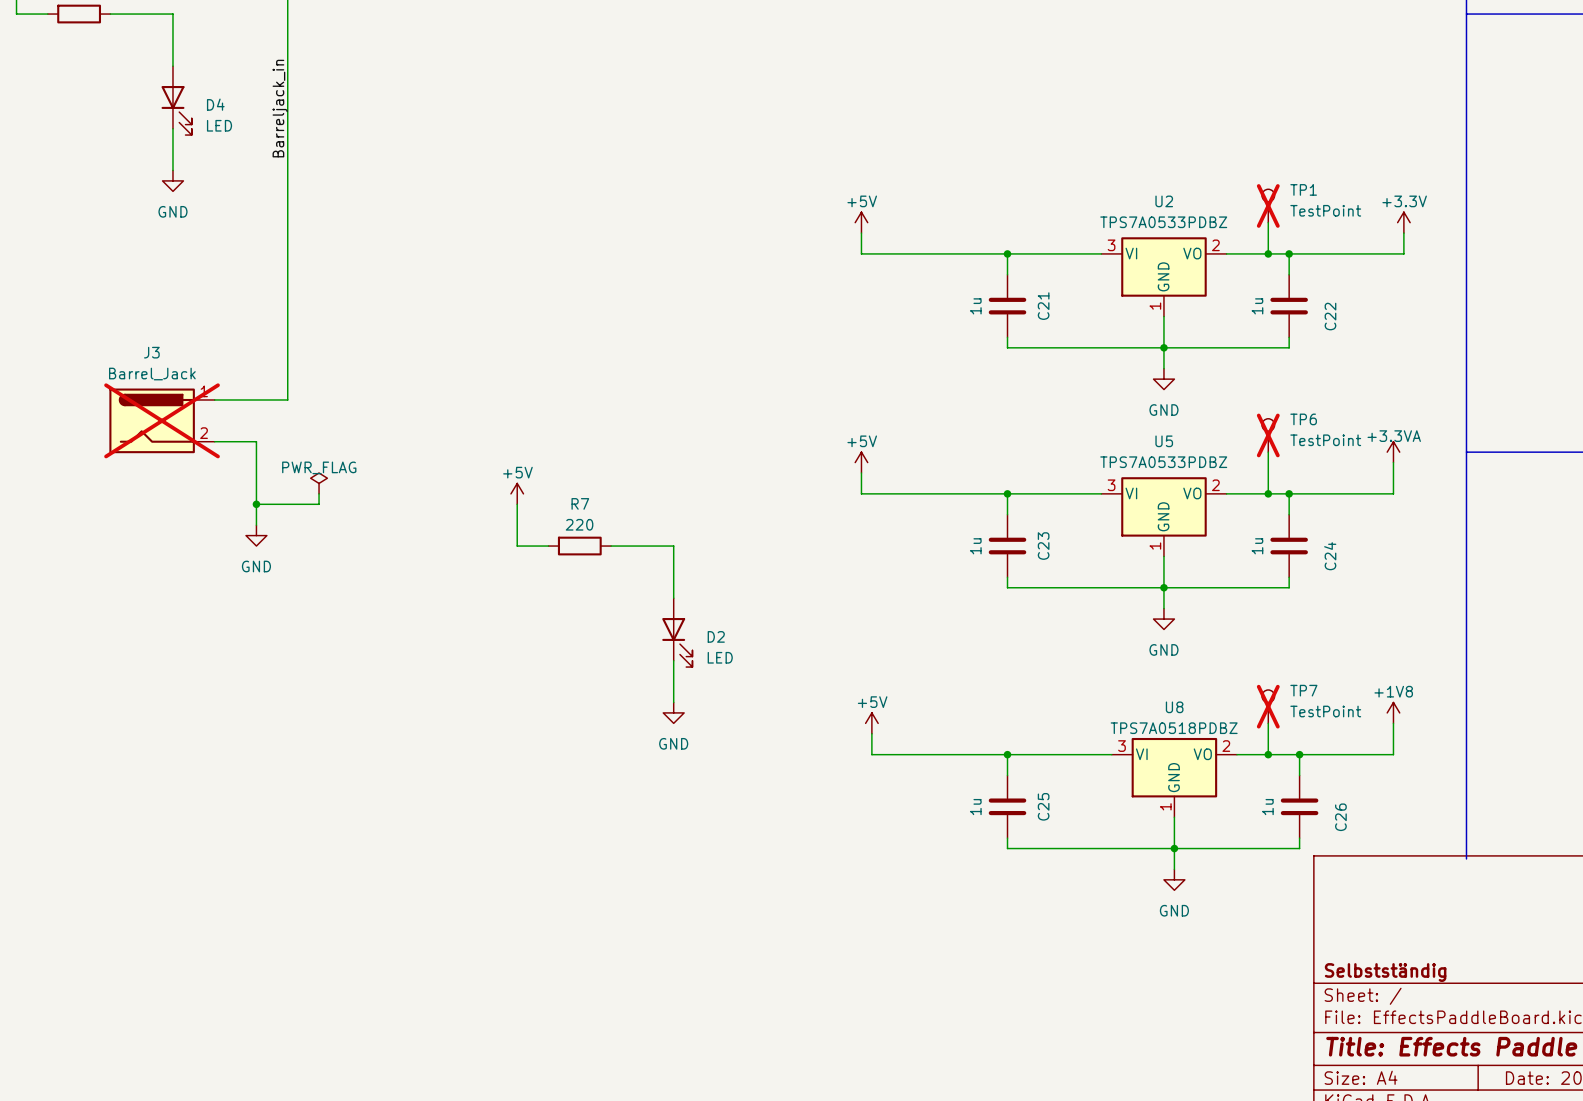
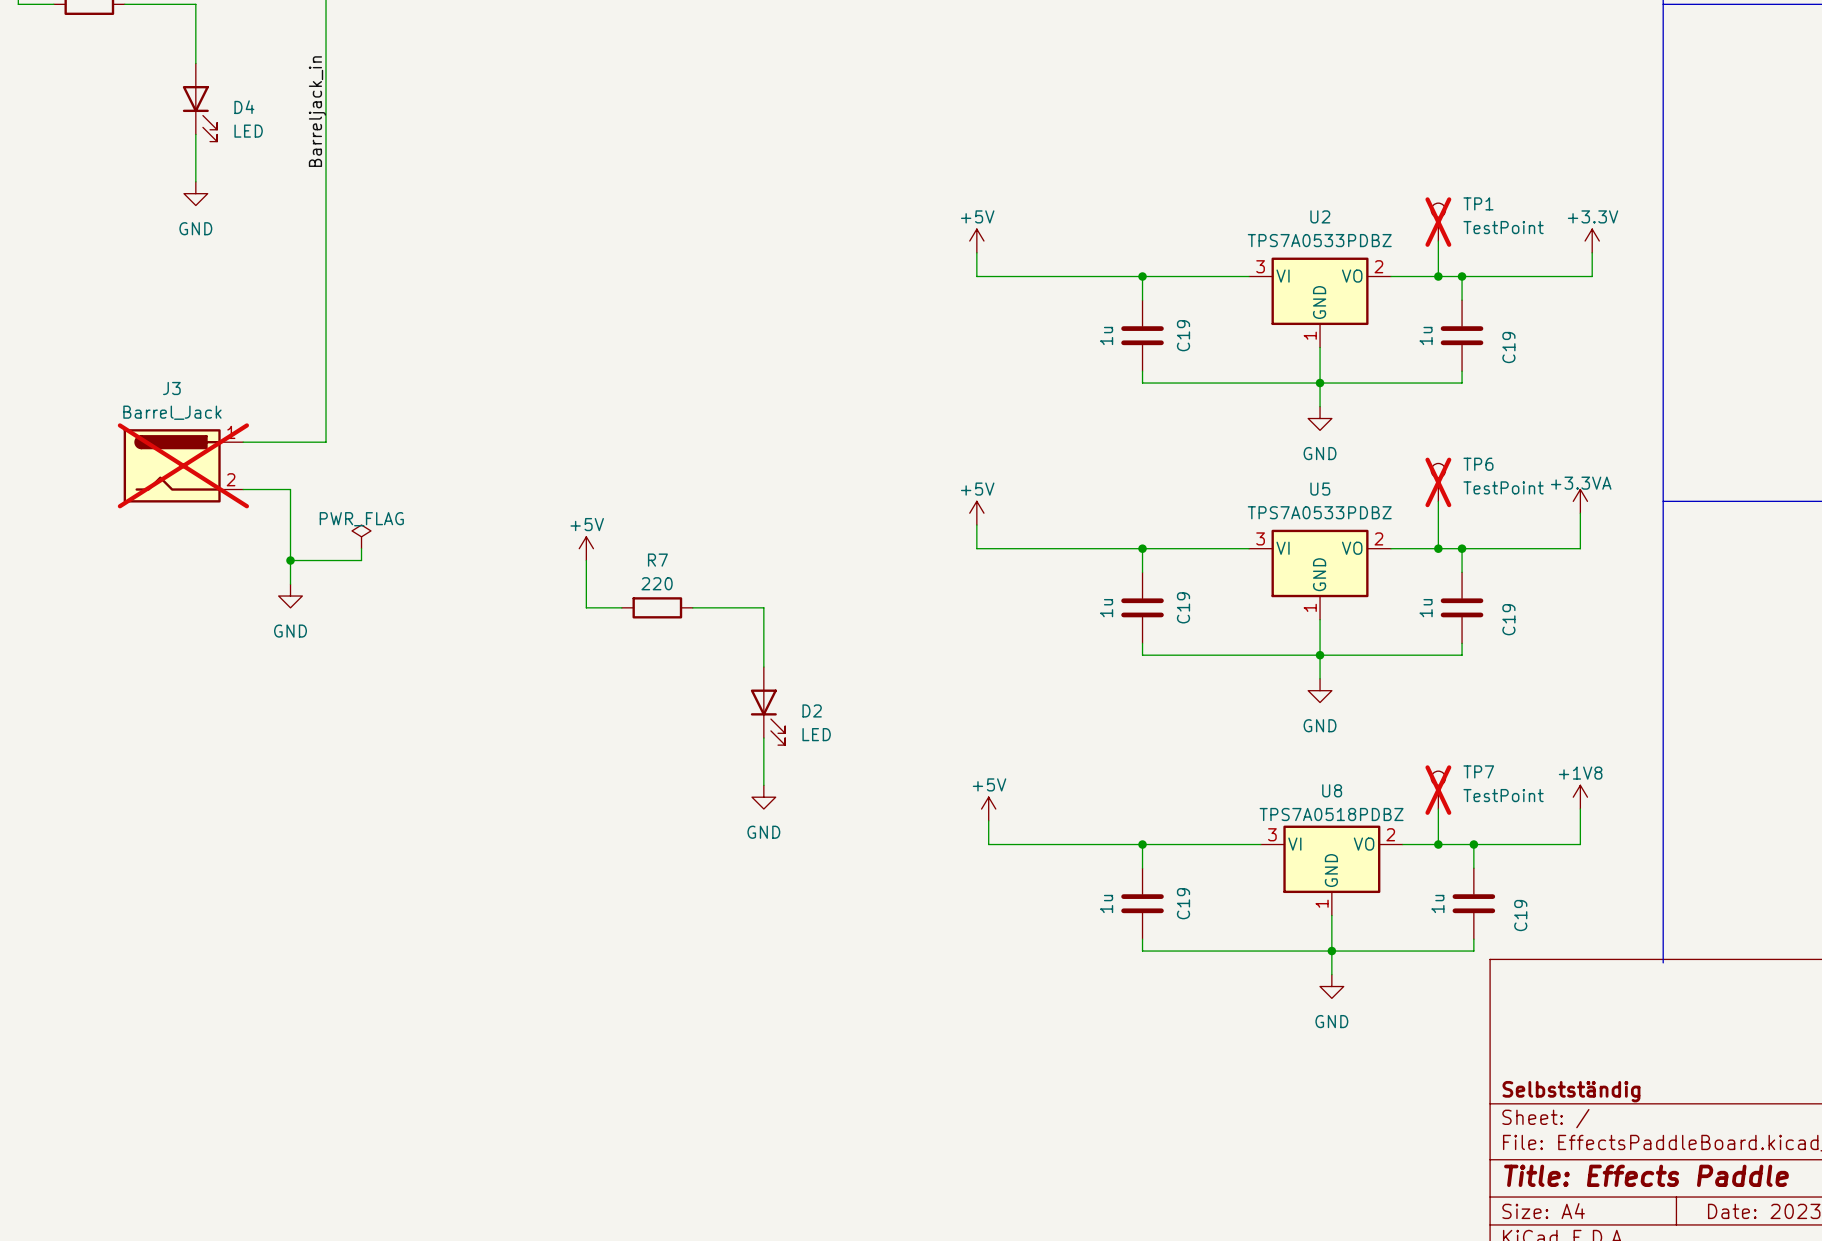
C21 name: C21 (1043, 306) -> C19 (1183, 335)
C22 name: C22 (1330, 316) -> C19 (1508, 347)
C23 name: C23 (1043, 546) -> C19 (1183, 607)
C24 name: C24 (1330, 556) -> C19 (1508, 619)
C25 name: C25 (1043, 806) -> C19 (1183, 903)
C26 name: C26 (1340, 817) -> C19 (1520, 915)

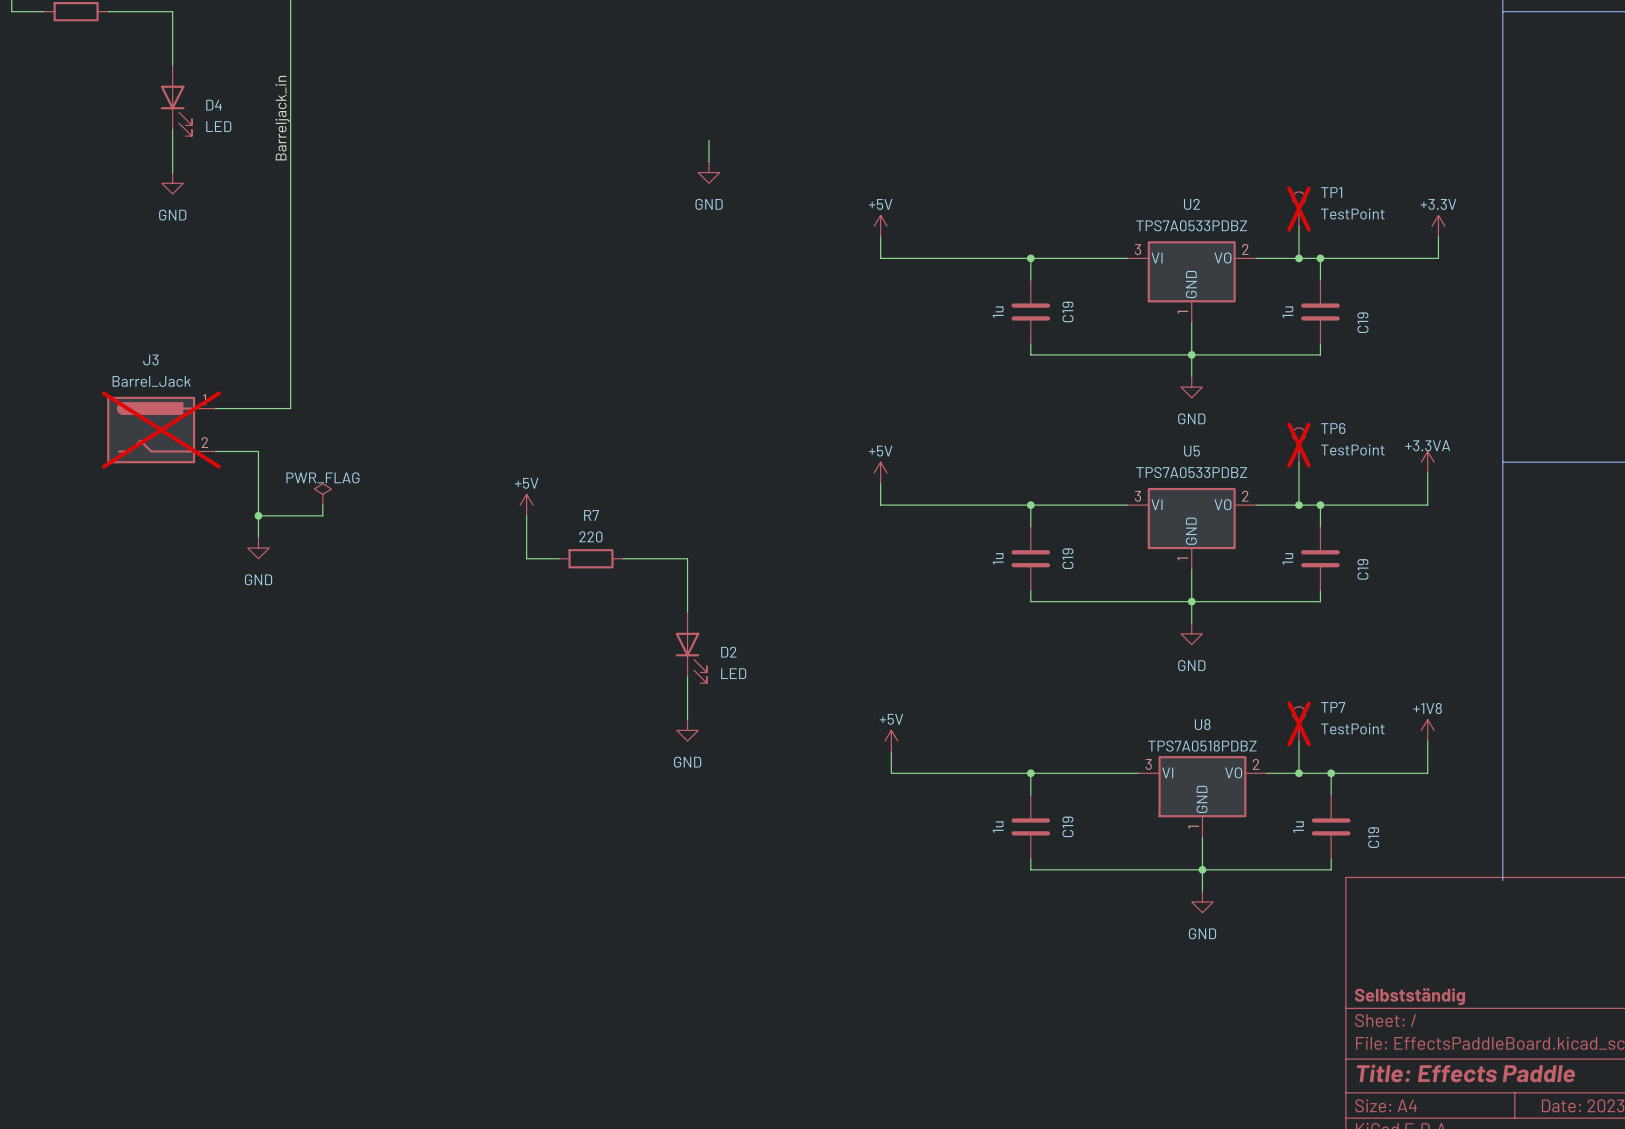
wire: none -> (709, 140) (709, 161)
power symbol: none -> GND (709, 172)

